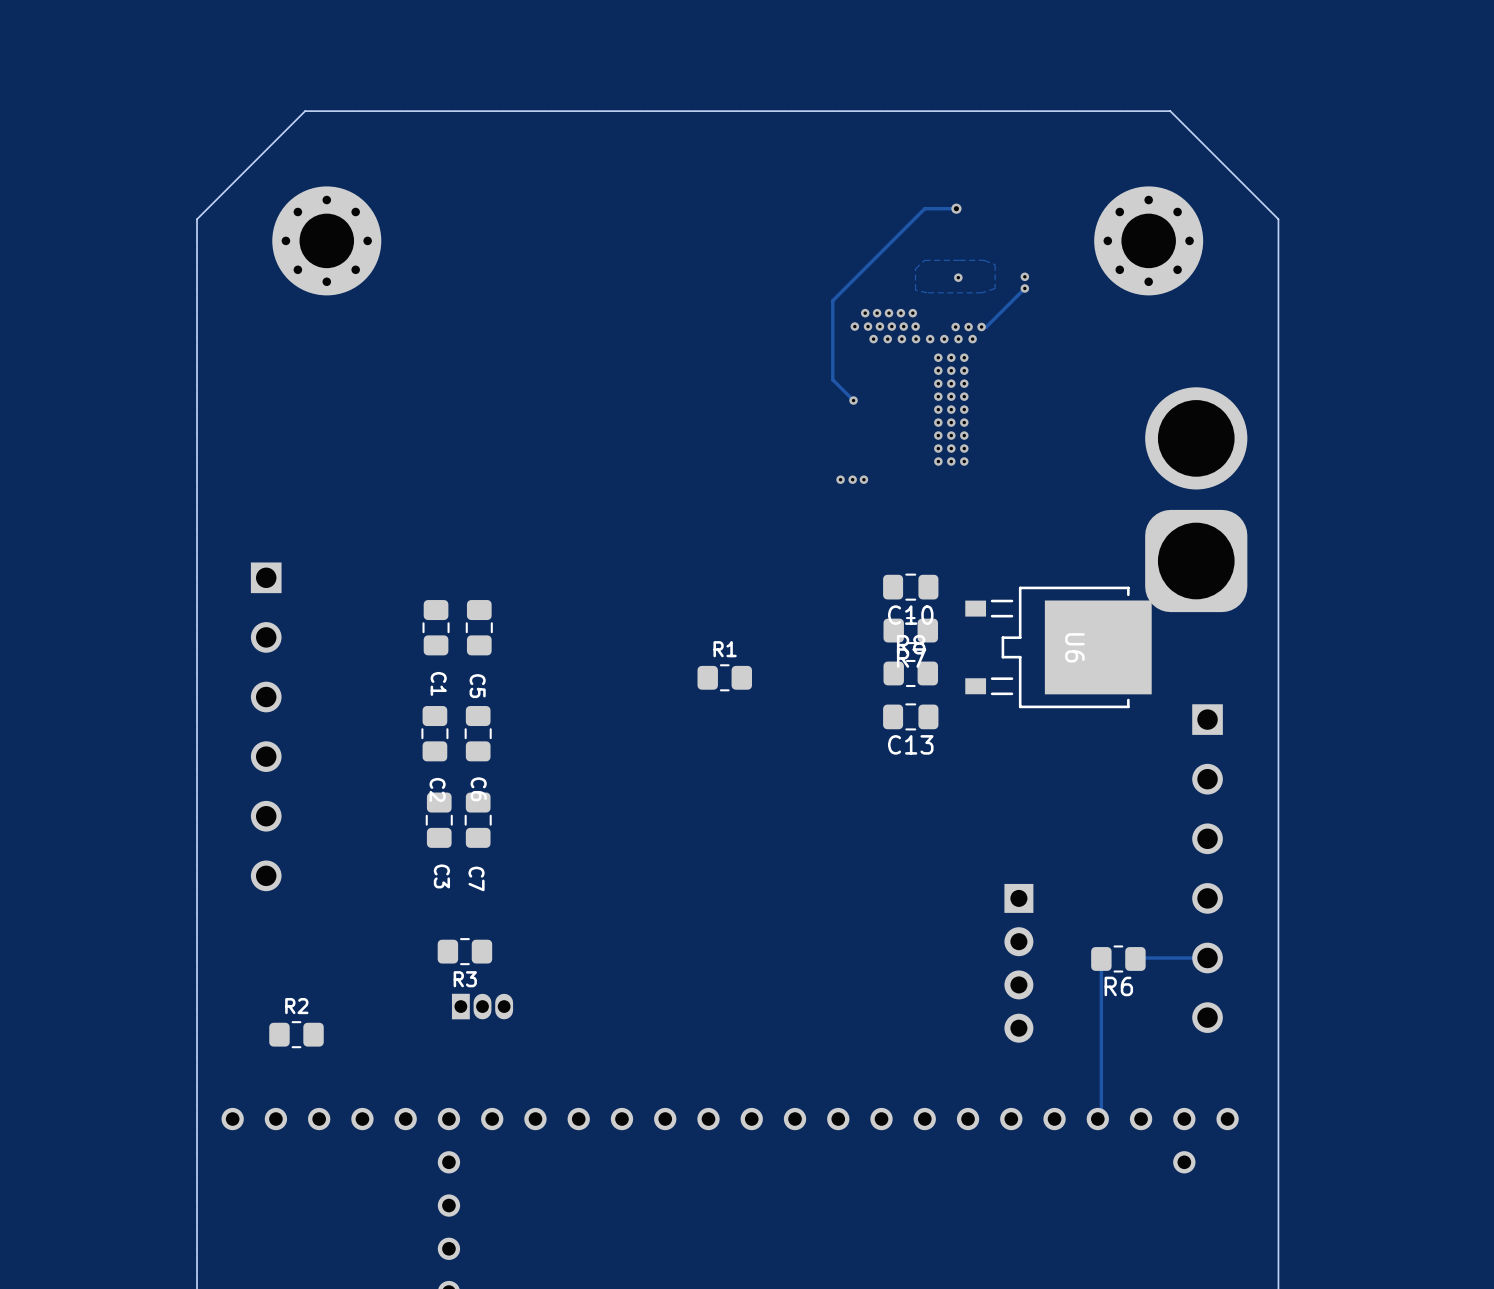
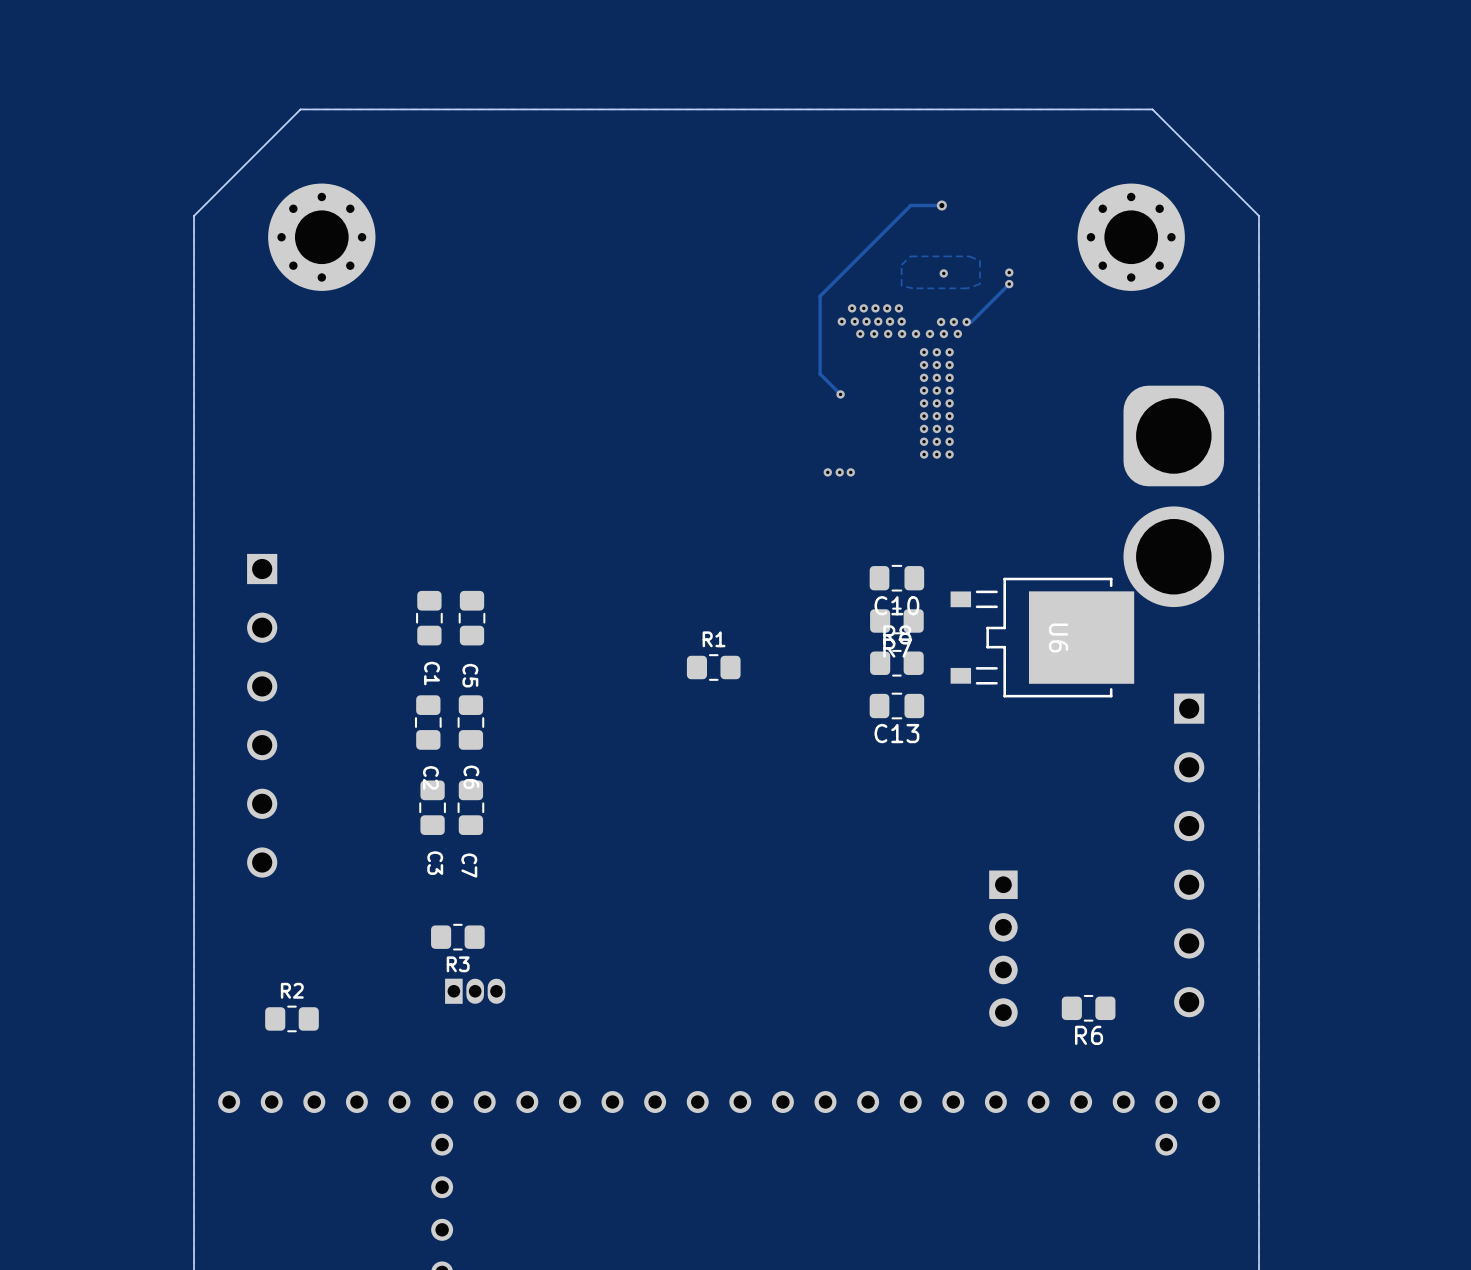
part rotation: 0° (1196, 499) -> 180° (1173, 496)
track: (1101, 958) (1101, 1115) (1097, 1119) -> none
R6 position: (1118, 958) -> (1088, 1008)
track: (1207, 958) (1135, 958) -> none

